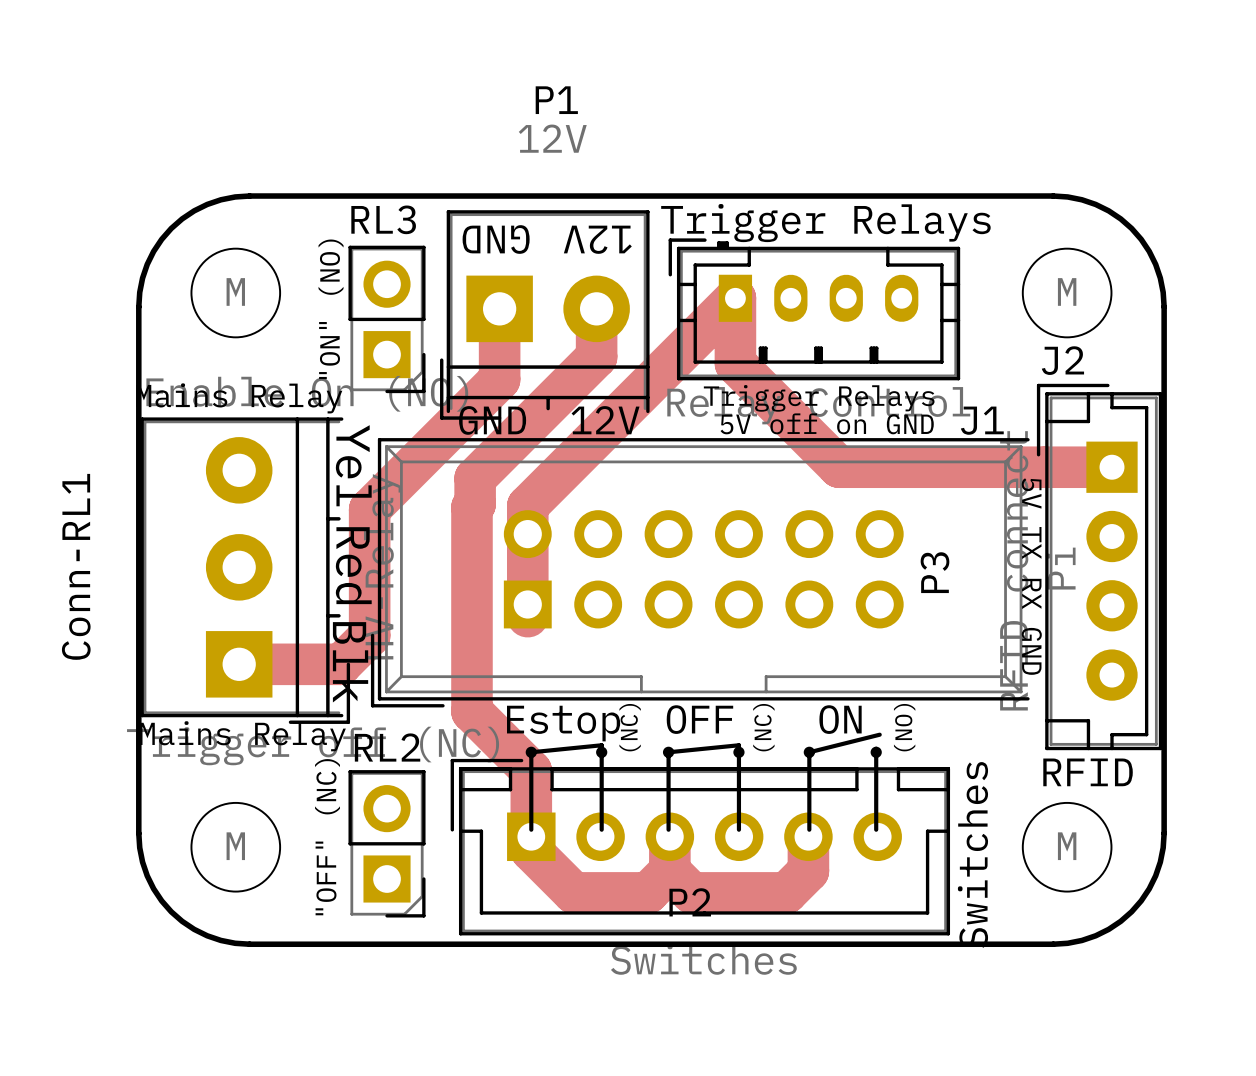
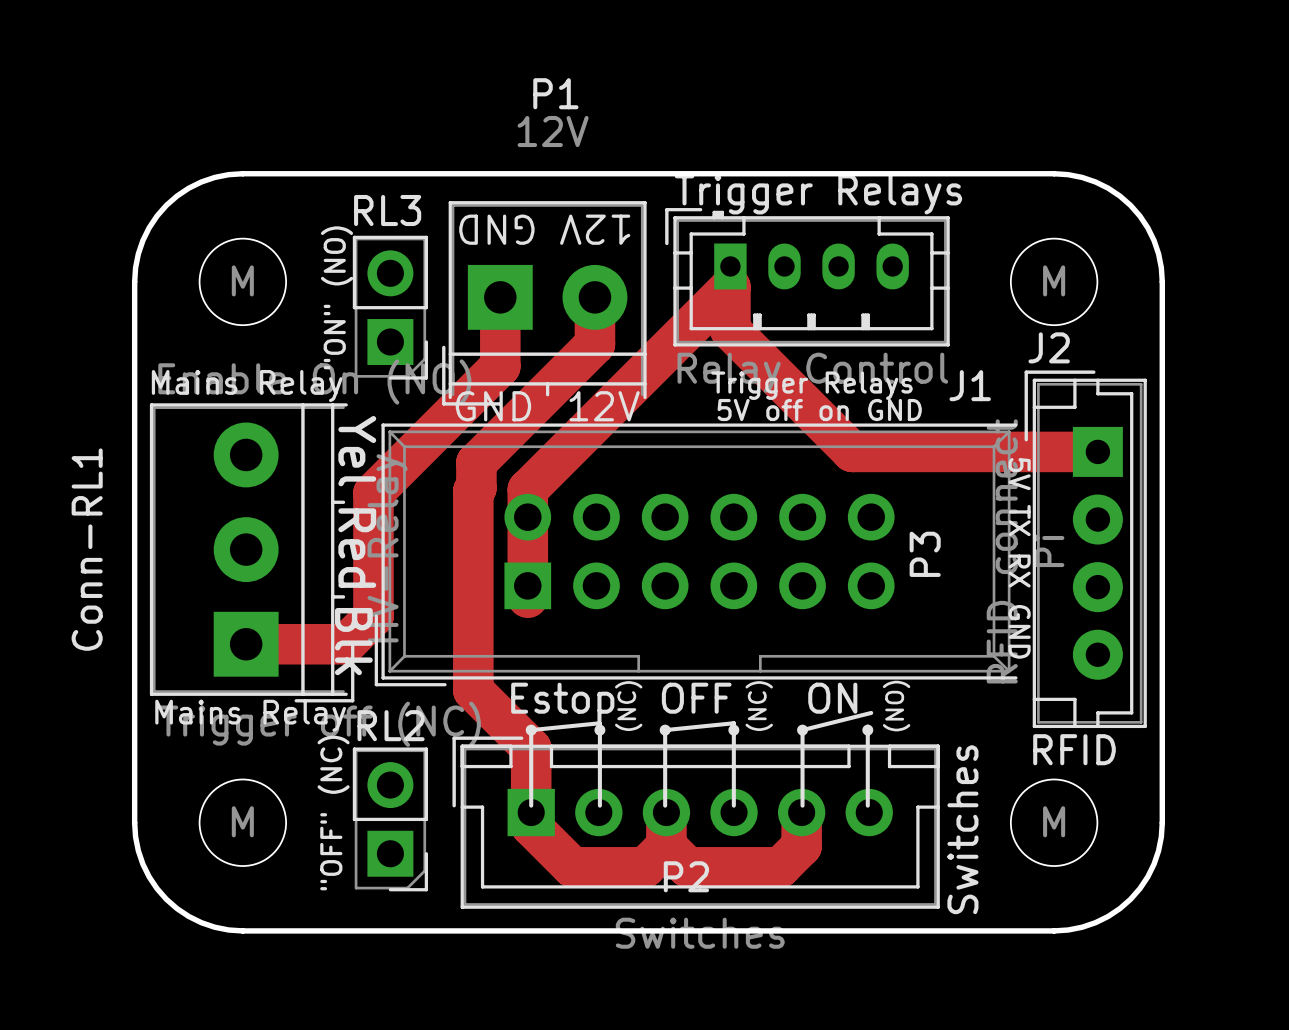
board edge: (249, 196) (1053, 196) (1081, 199) (1095, 204) (1120, 218) (1141, 239) (1149, 251) (1160, 278) (1164, 306) (1164, 833) (1160, 862) (1155, 875) (1141, 900) (1120, 921) (1095, 935) (1081, 940) (1053, 944) (249, 944) (220, 940) (207, 935) (182, 921) (161, 900) (153, 888) (147, 875) (139, 847) (139, 292) (147, 264) (153, 251) (161, 239) (182, 218) (207, 204) (220, 199) (249, 196) -> (242, 173) (214, 177) (201, 181) (176, 196) (157, 216) (149, 227) (142, 240) (135, 267) (134, 822) (138, 850) (149, 876) (157, 888) (176, 908) (201, 922) (214, 927) (242, 930) (1054, 930) (1082, 927) (1095, 922) (1119, 908) (1139, 888) (1154, 864) (1158, 850) (1162, 822) (1162, 281) (1158, 253) (1147, 227) (1139, 216) (1119, 196) (1095, 181) (1082, 177) (1054, 173) (242, 173)
text position: Trigger Relays (825, 223) -> Trigger Relays (818, 194)
J1 position: (814, 309) -> (807, 277)
track: (735, 342) (735, 363) (839, 467) (860, 467) -> (730, 330) (852, 451)

